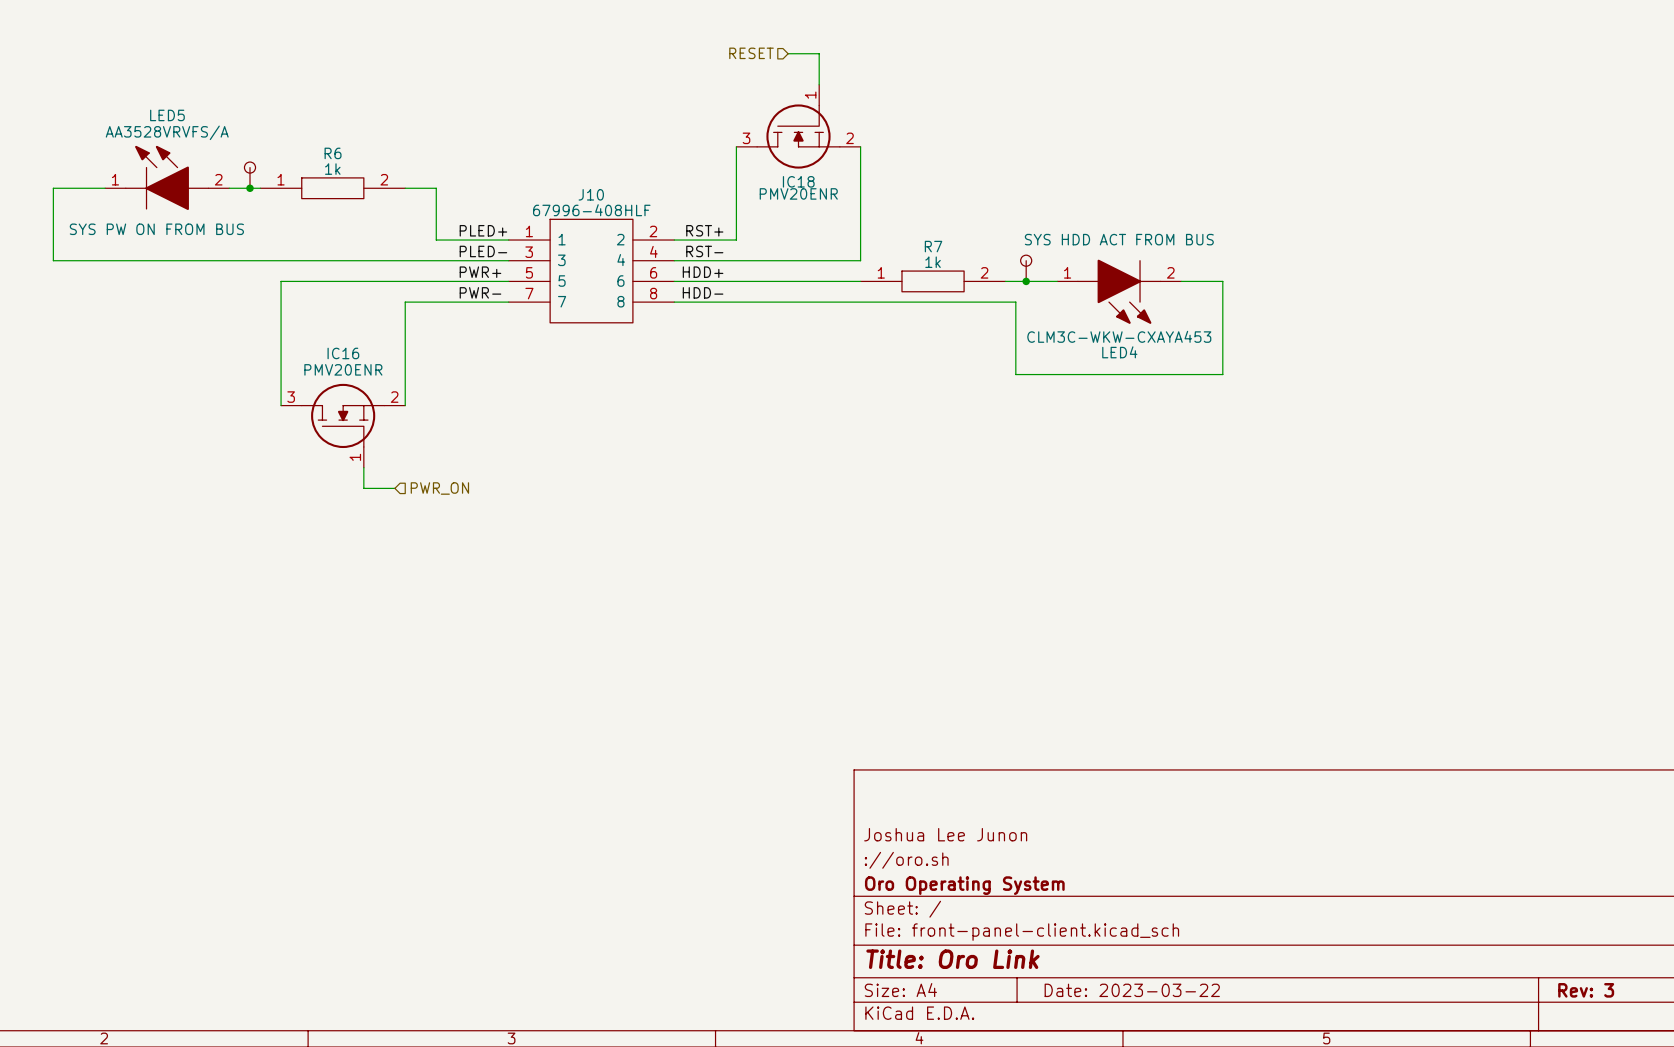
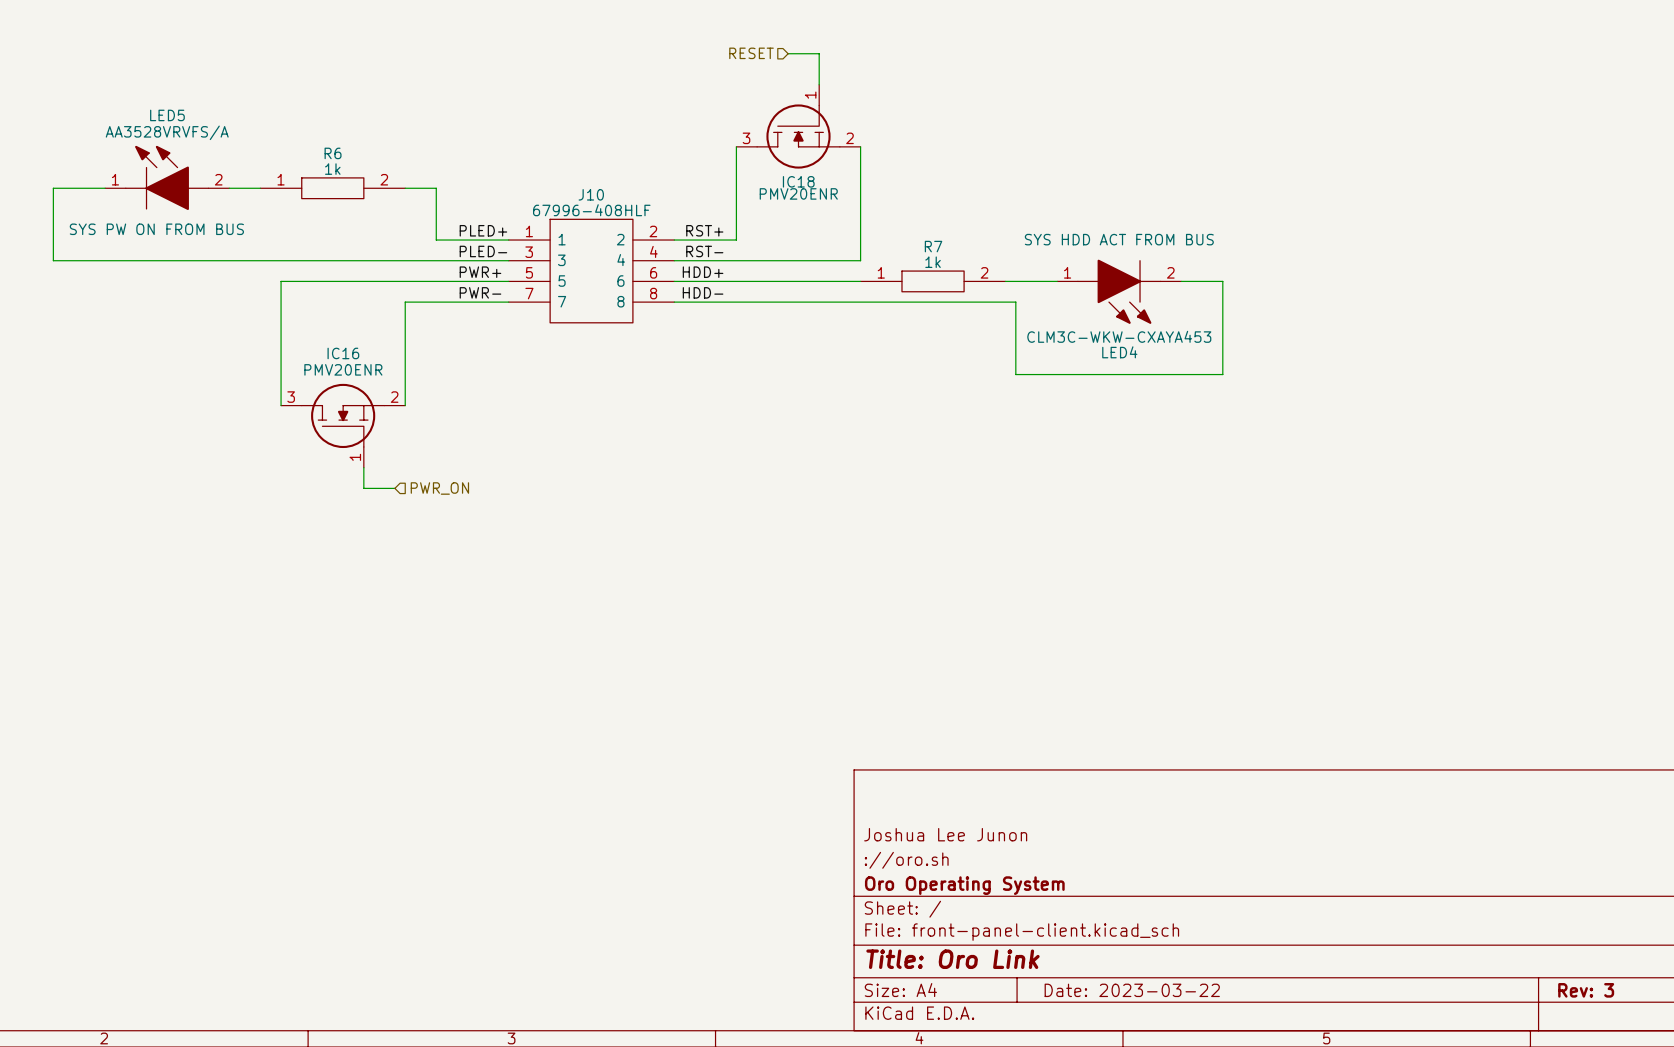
part: (250, 175) -> none
junction: (250, 188) -> none
part: (1026, 268) -> none
junction: (1026, 281) -> none

